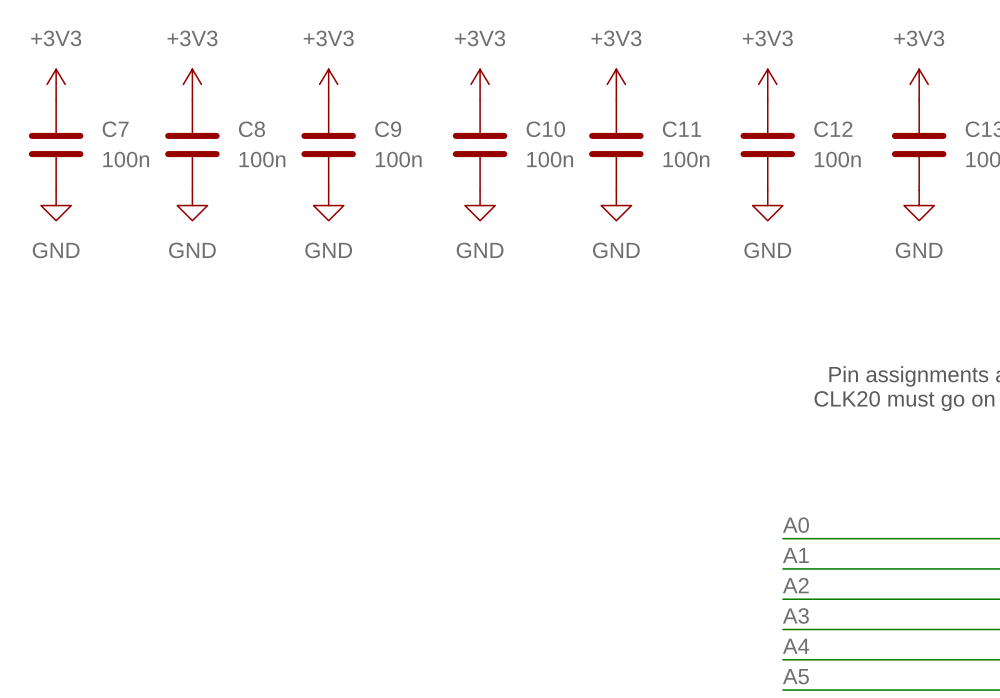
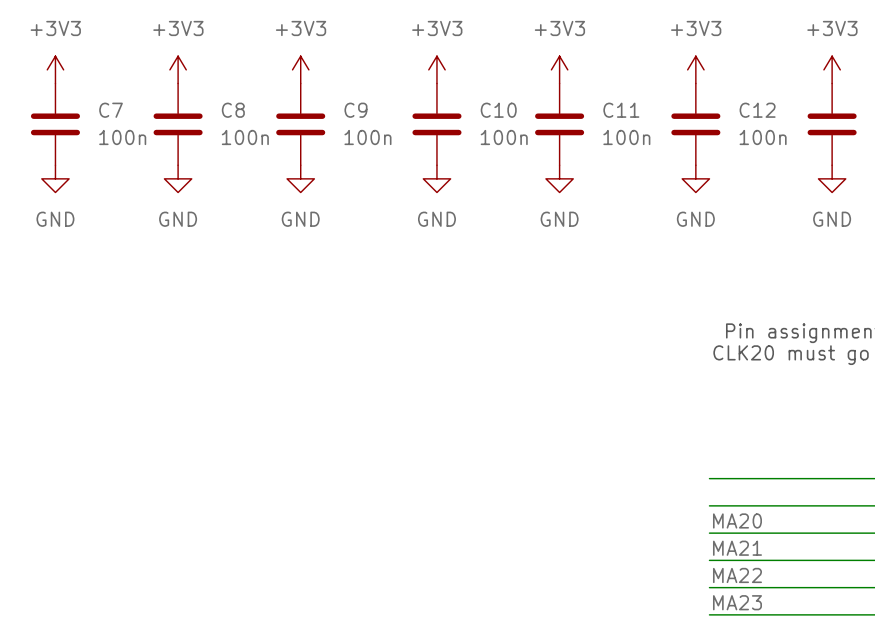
label: A0 (795, 525) -> none
label: A1 (795, 555) -> none
label: A2 (795, 585) -> MA20 (737, 520)
label: A3 (795, 615) -> MA21 (737, 548)
label: A4 (796, 646) -> MA22 (737, 575)
label: A5 (795, 676) -> MA23 (737, 602)

